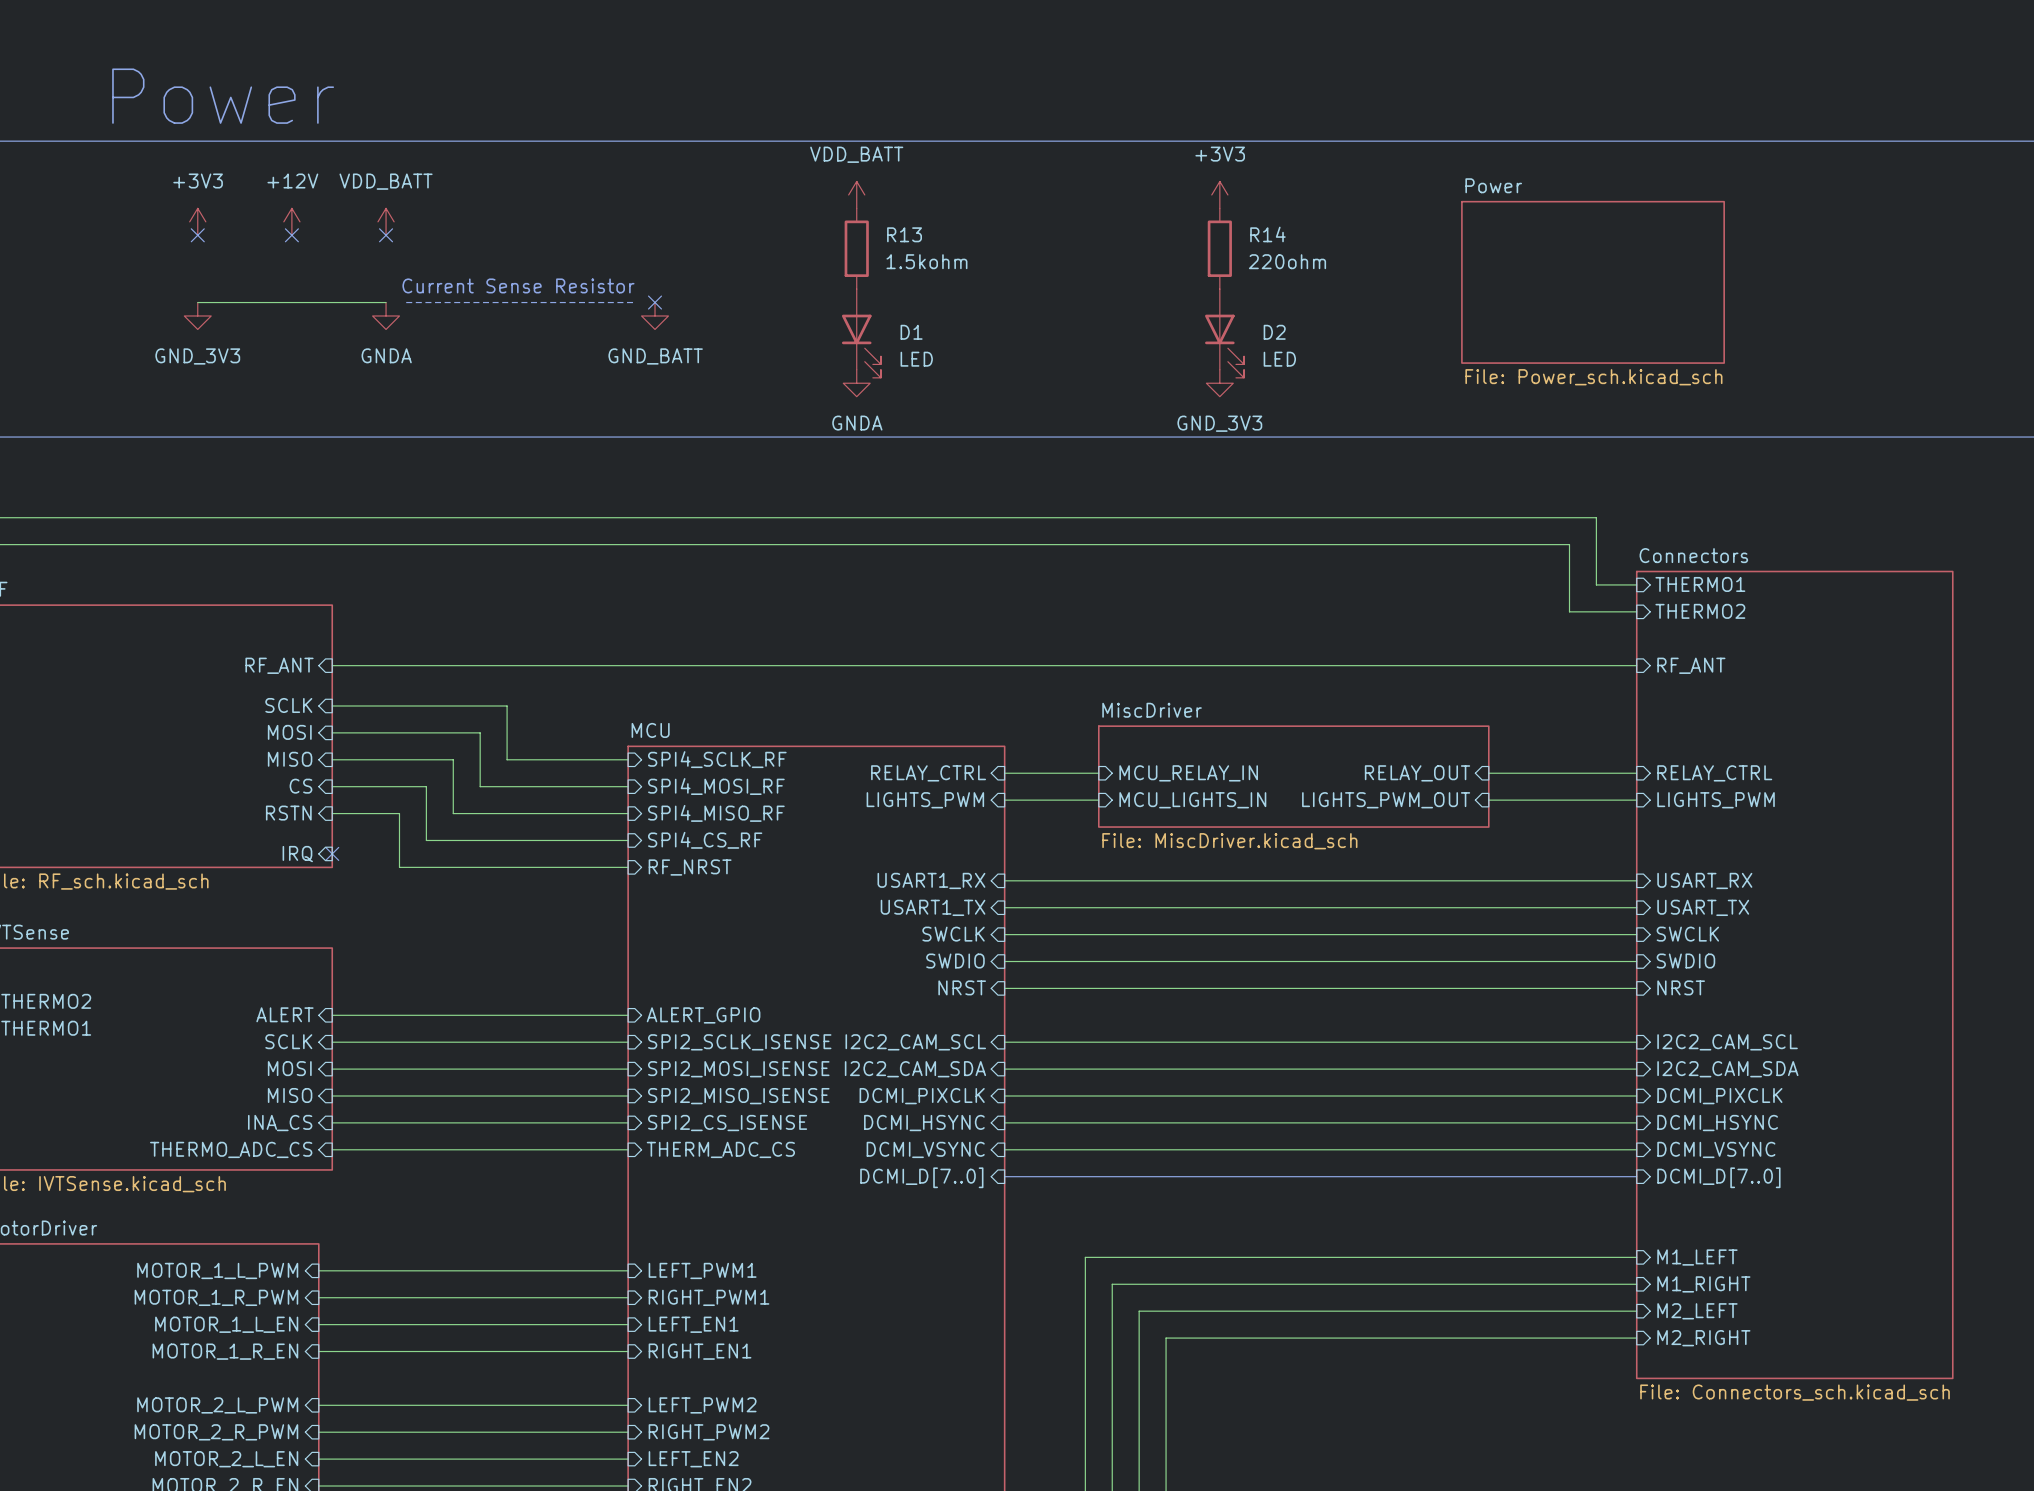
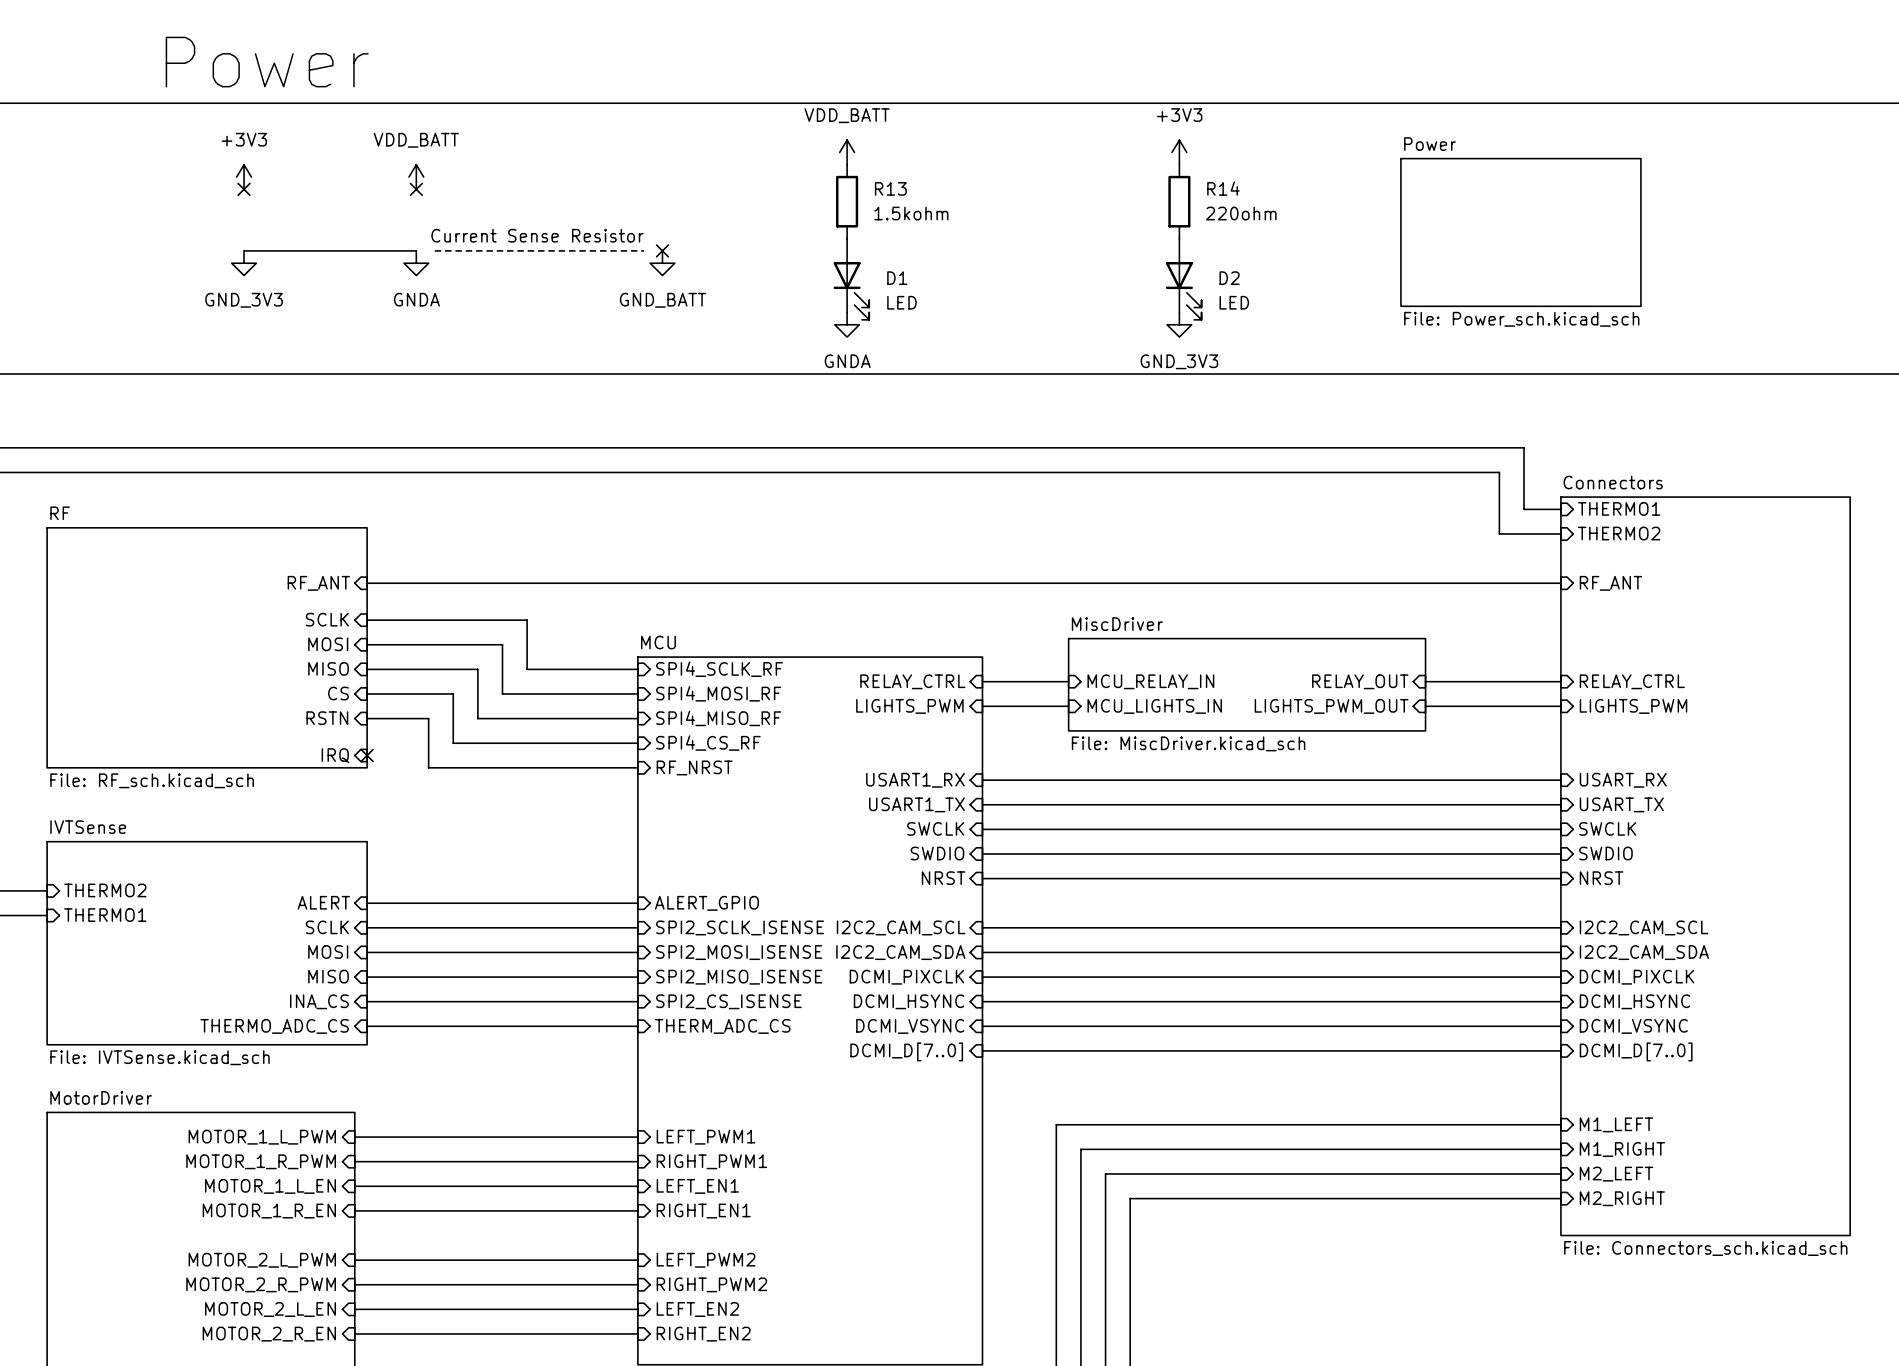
power symbol: +12V (291, 221) -> none
no-connect mark: (291, 235) -> none

